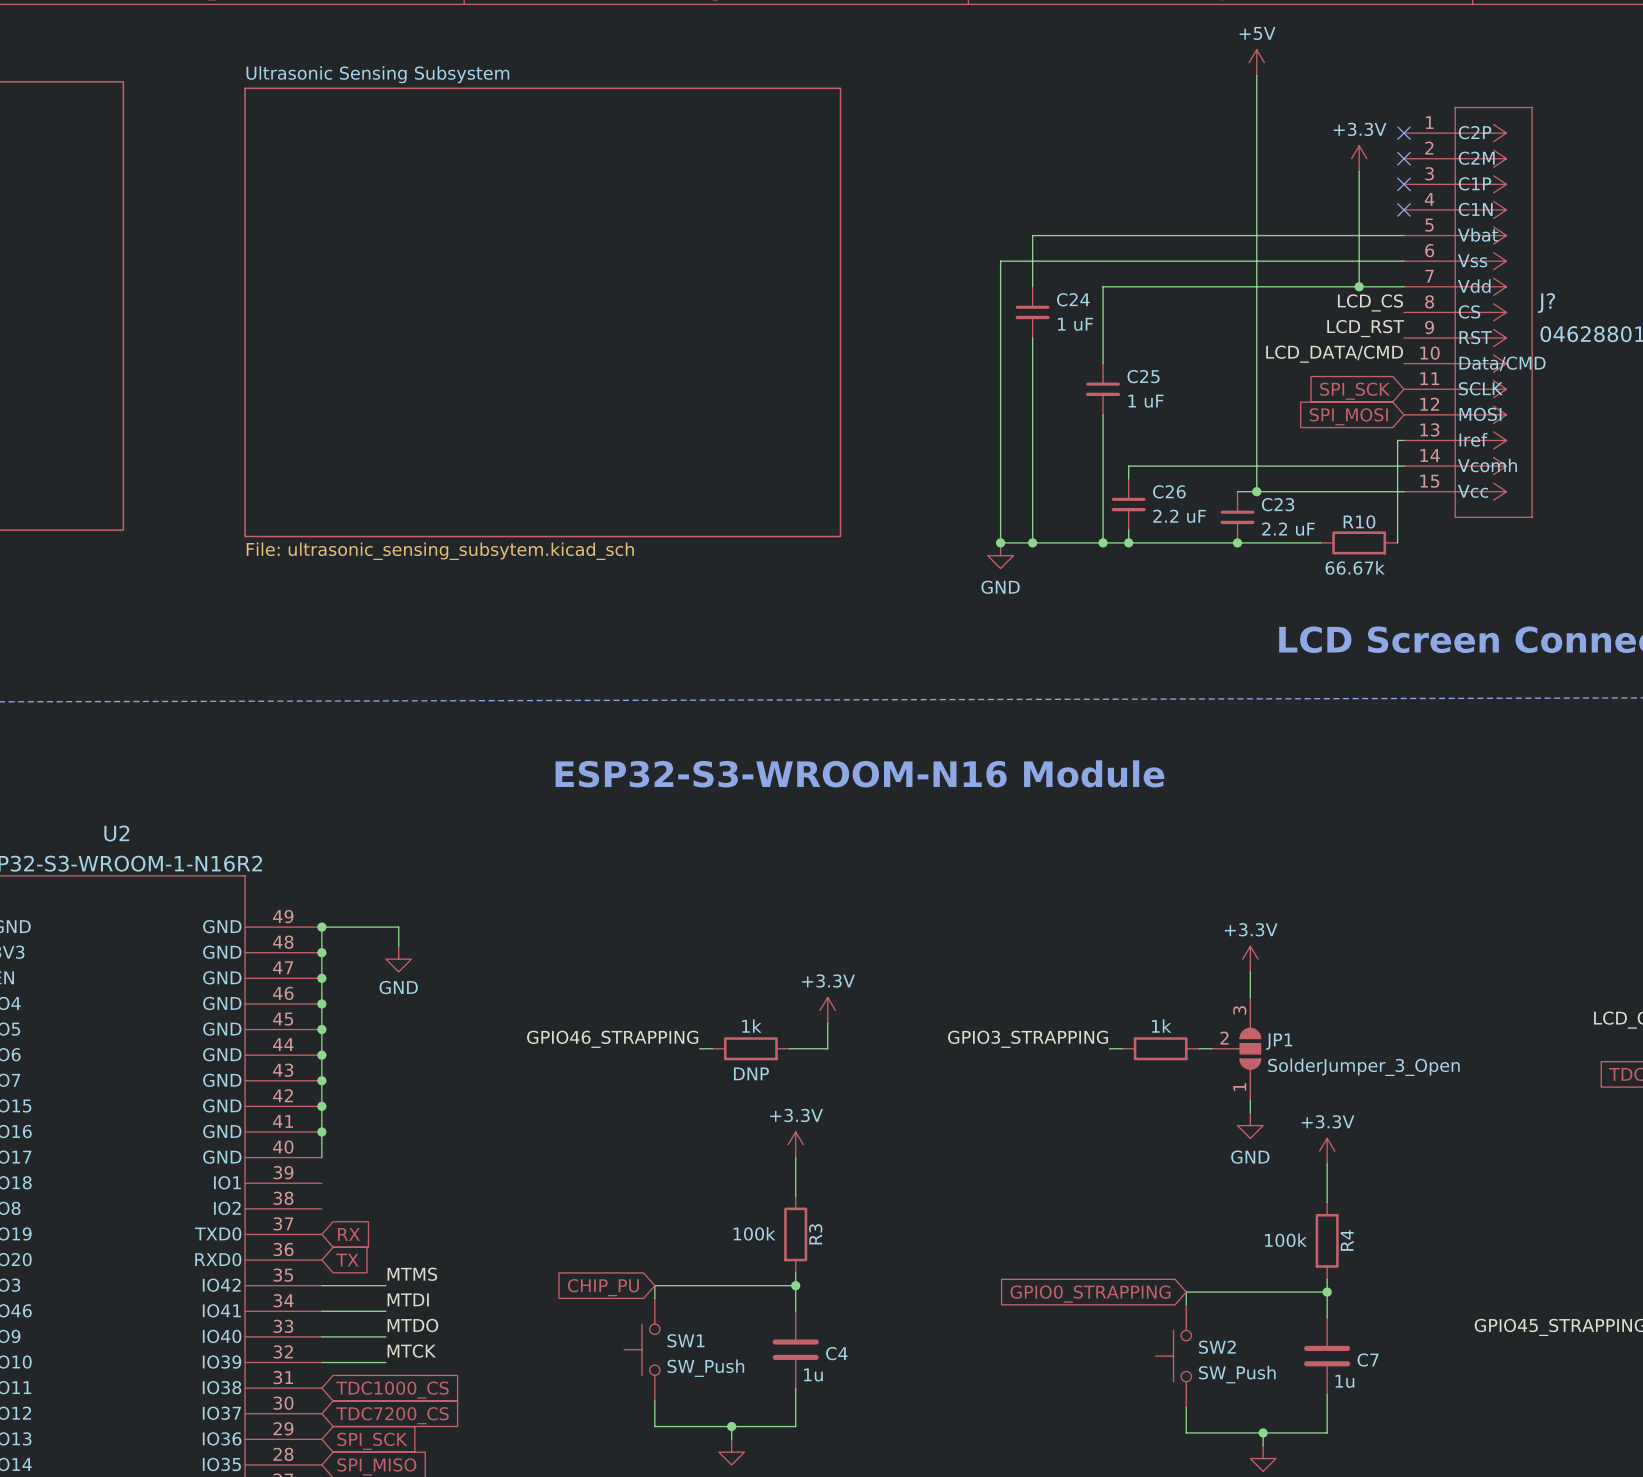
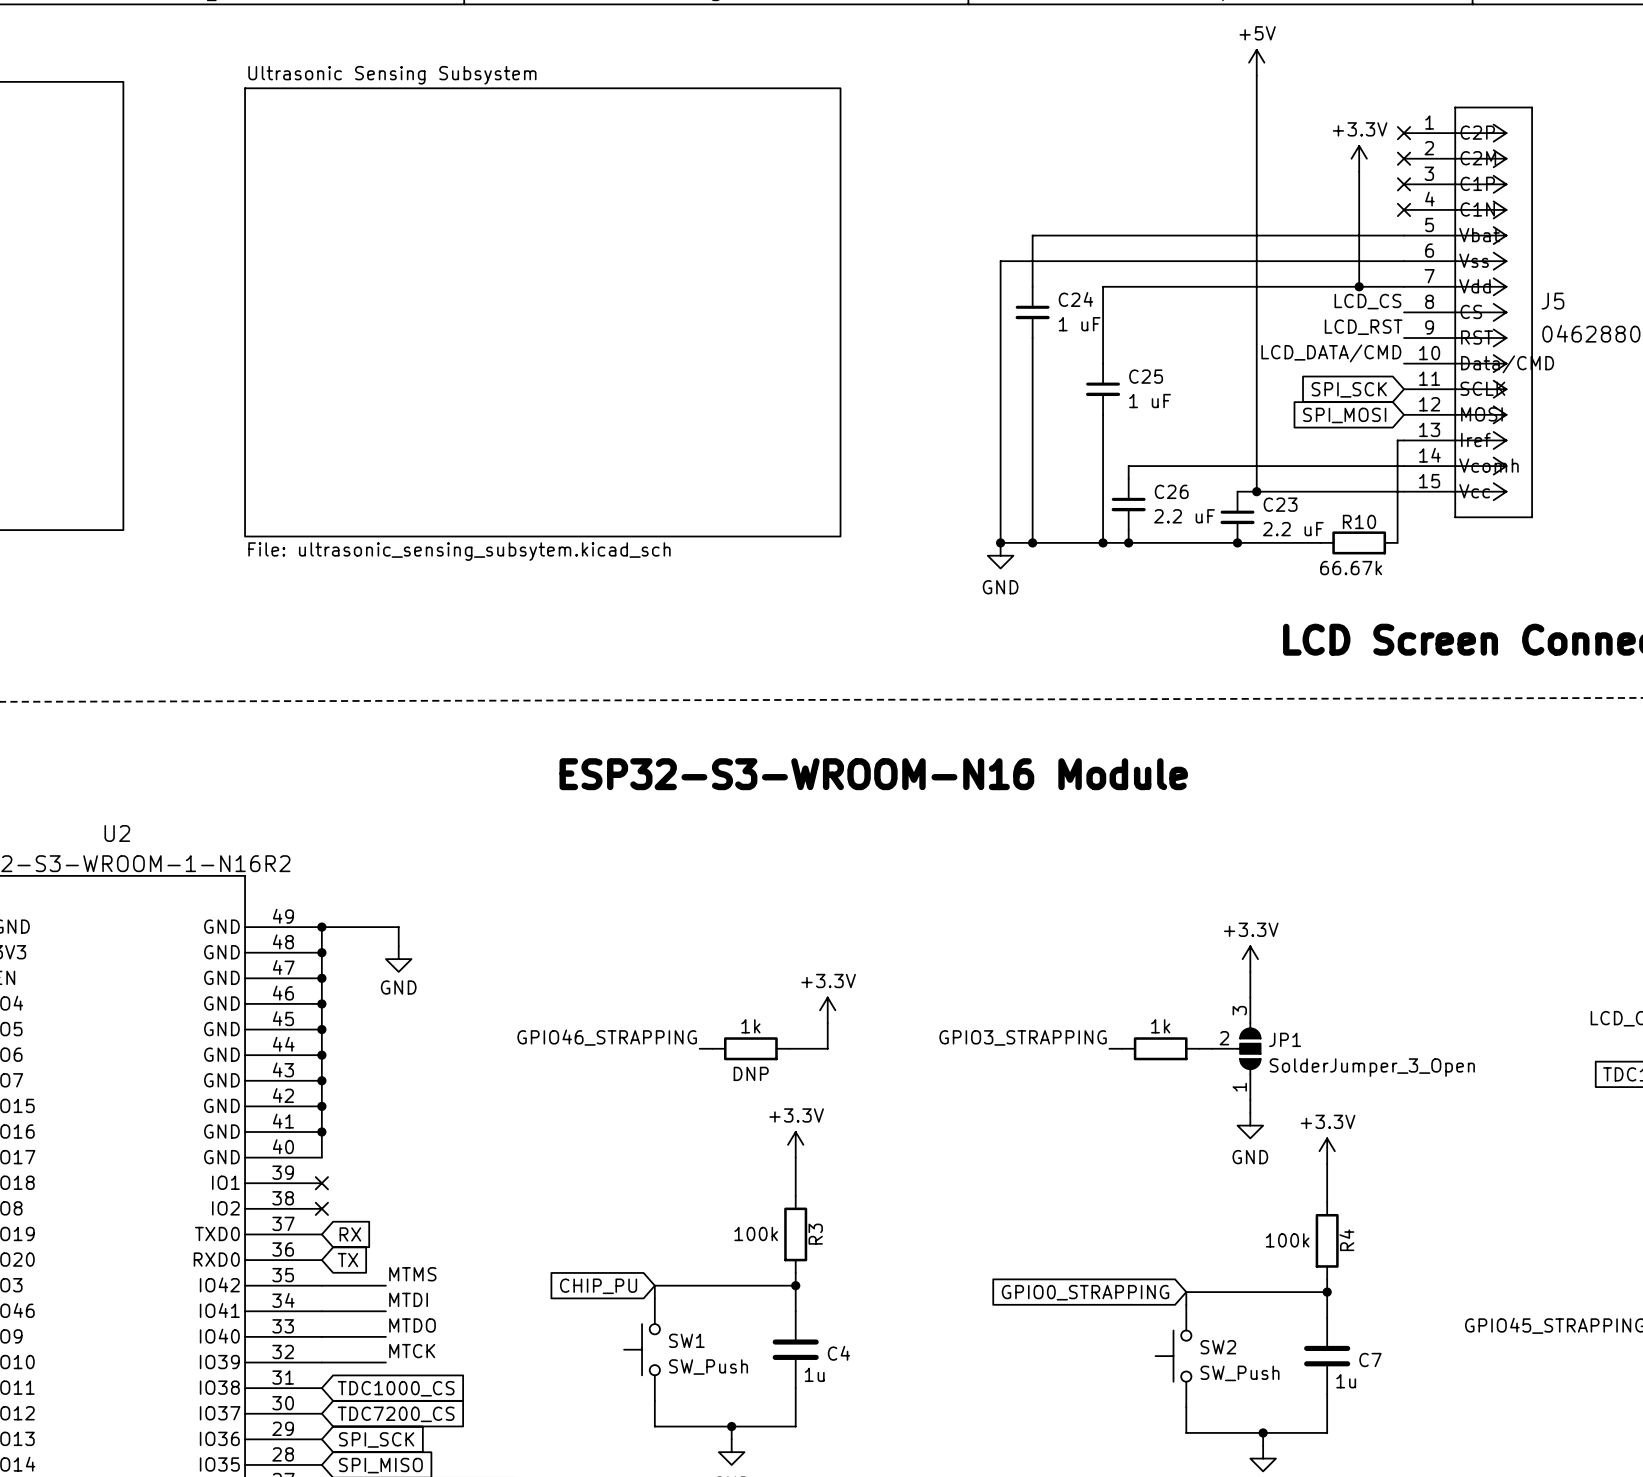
J? name: J? (1546, 303) -> J5 (1552, 301)
no-connect mark: none -> (321, 1183)
no-connect mark: none -> (321, 1208)

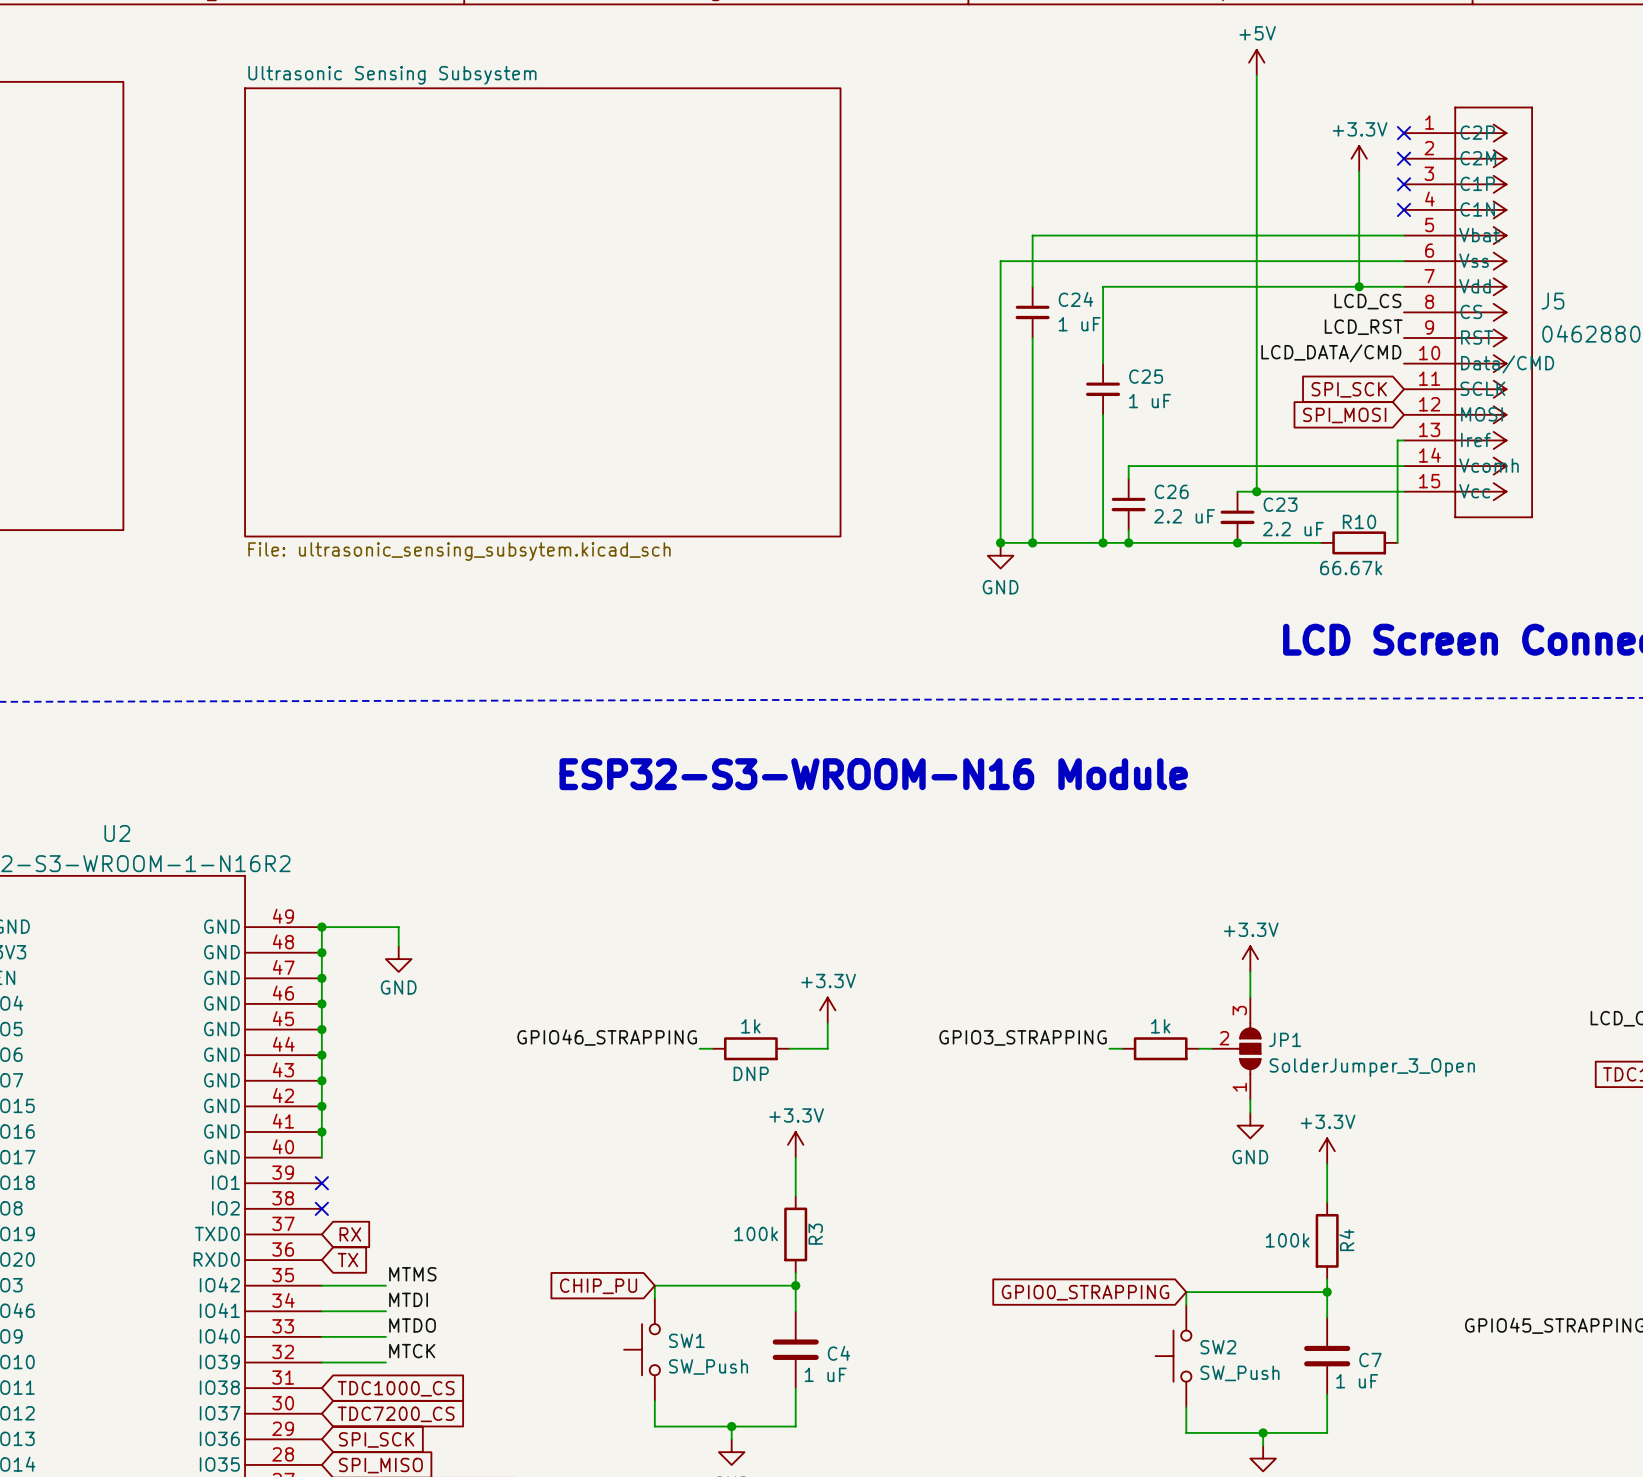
C4 value: 1u (814, 1374) -> 1 uF (825, 1374)
C7 value: 1u (1346, 1381) -> 1 uF (1357, 1381)

